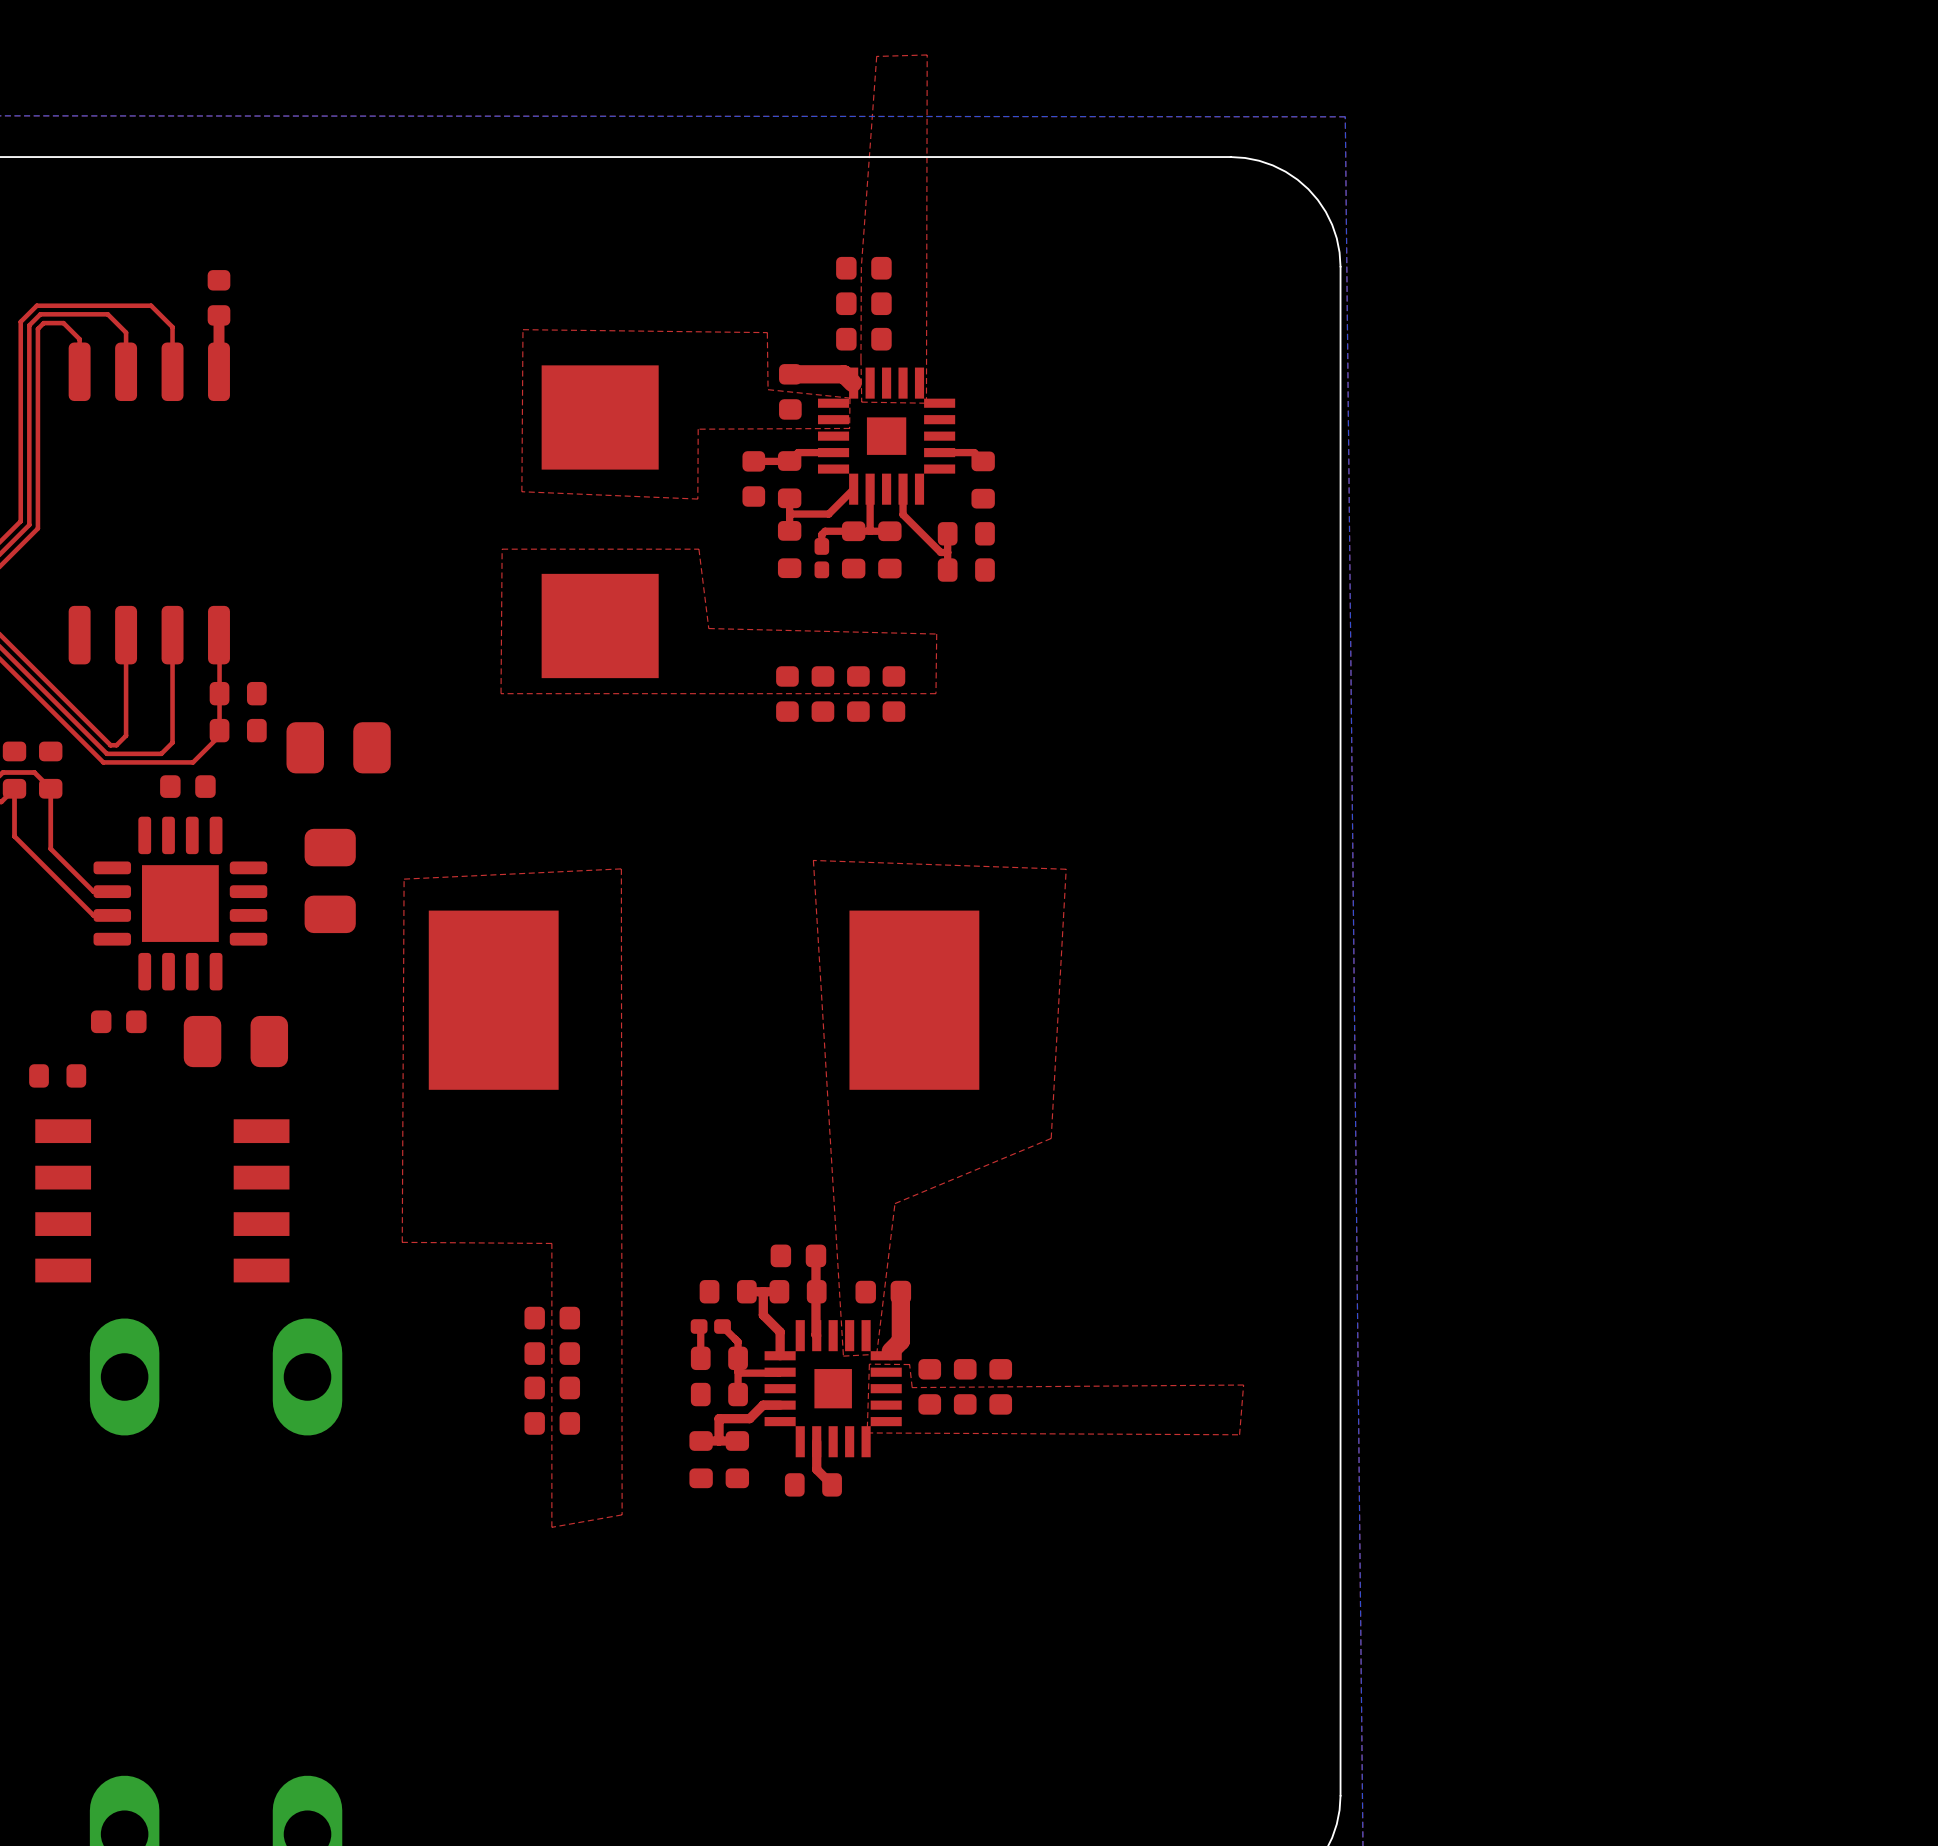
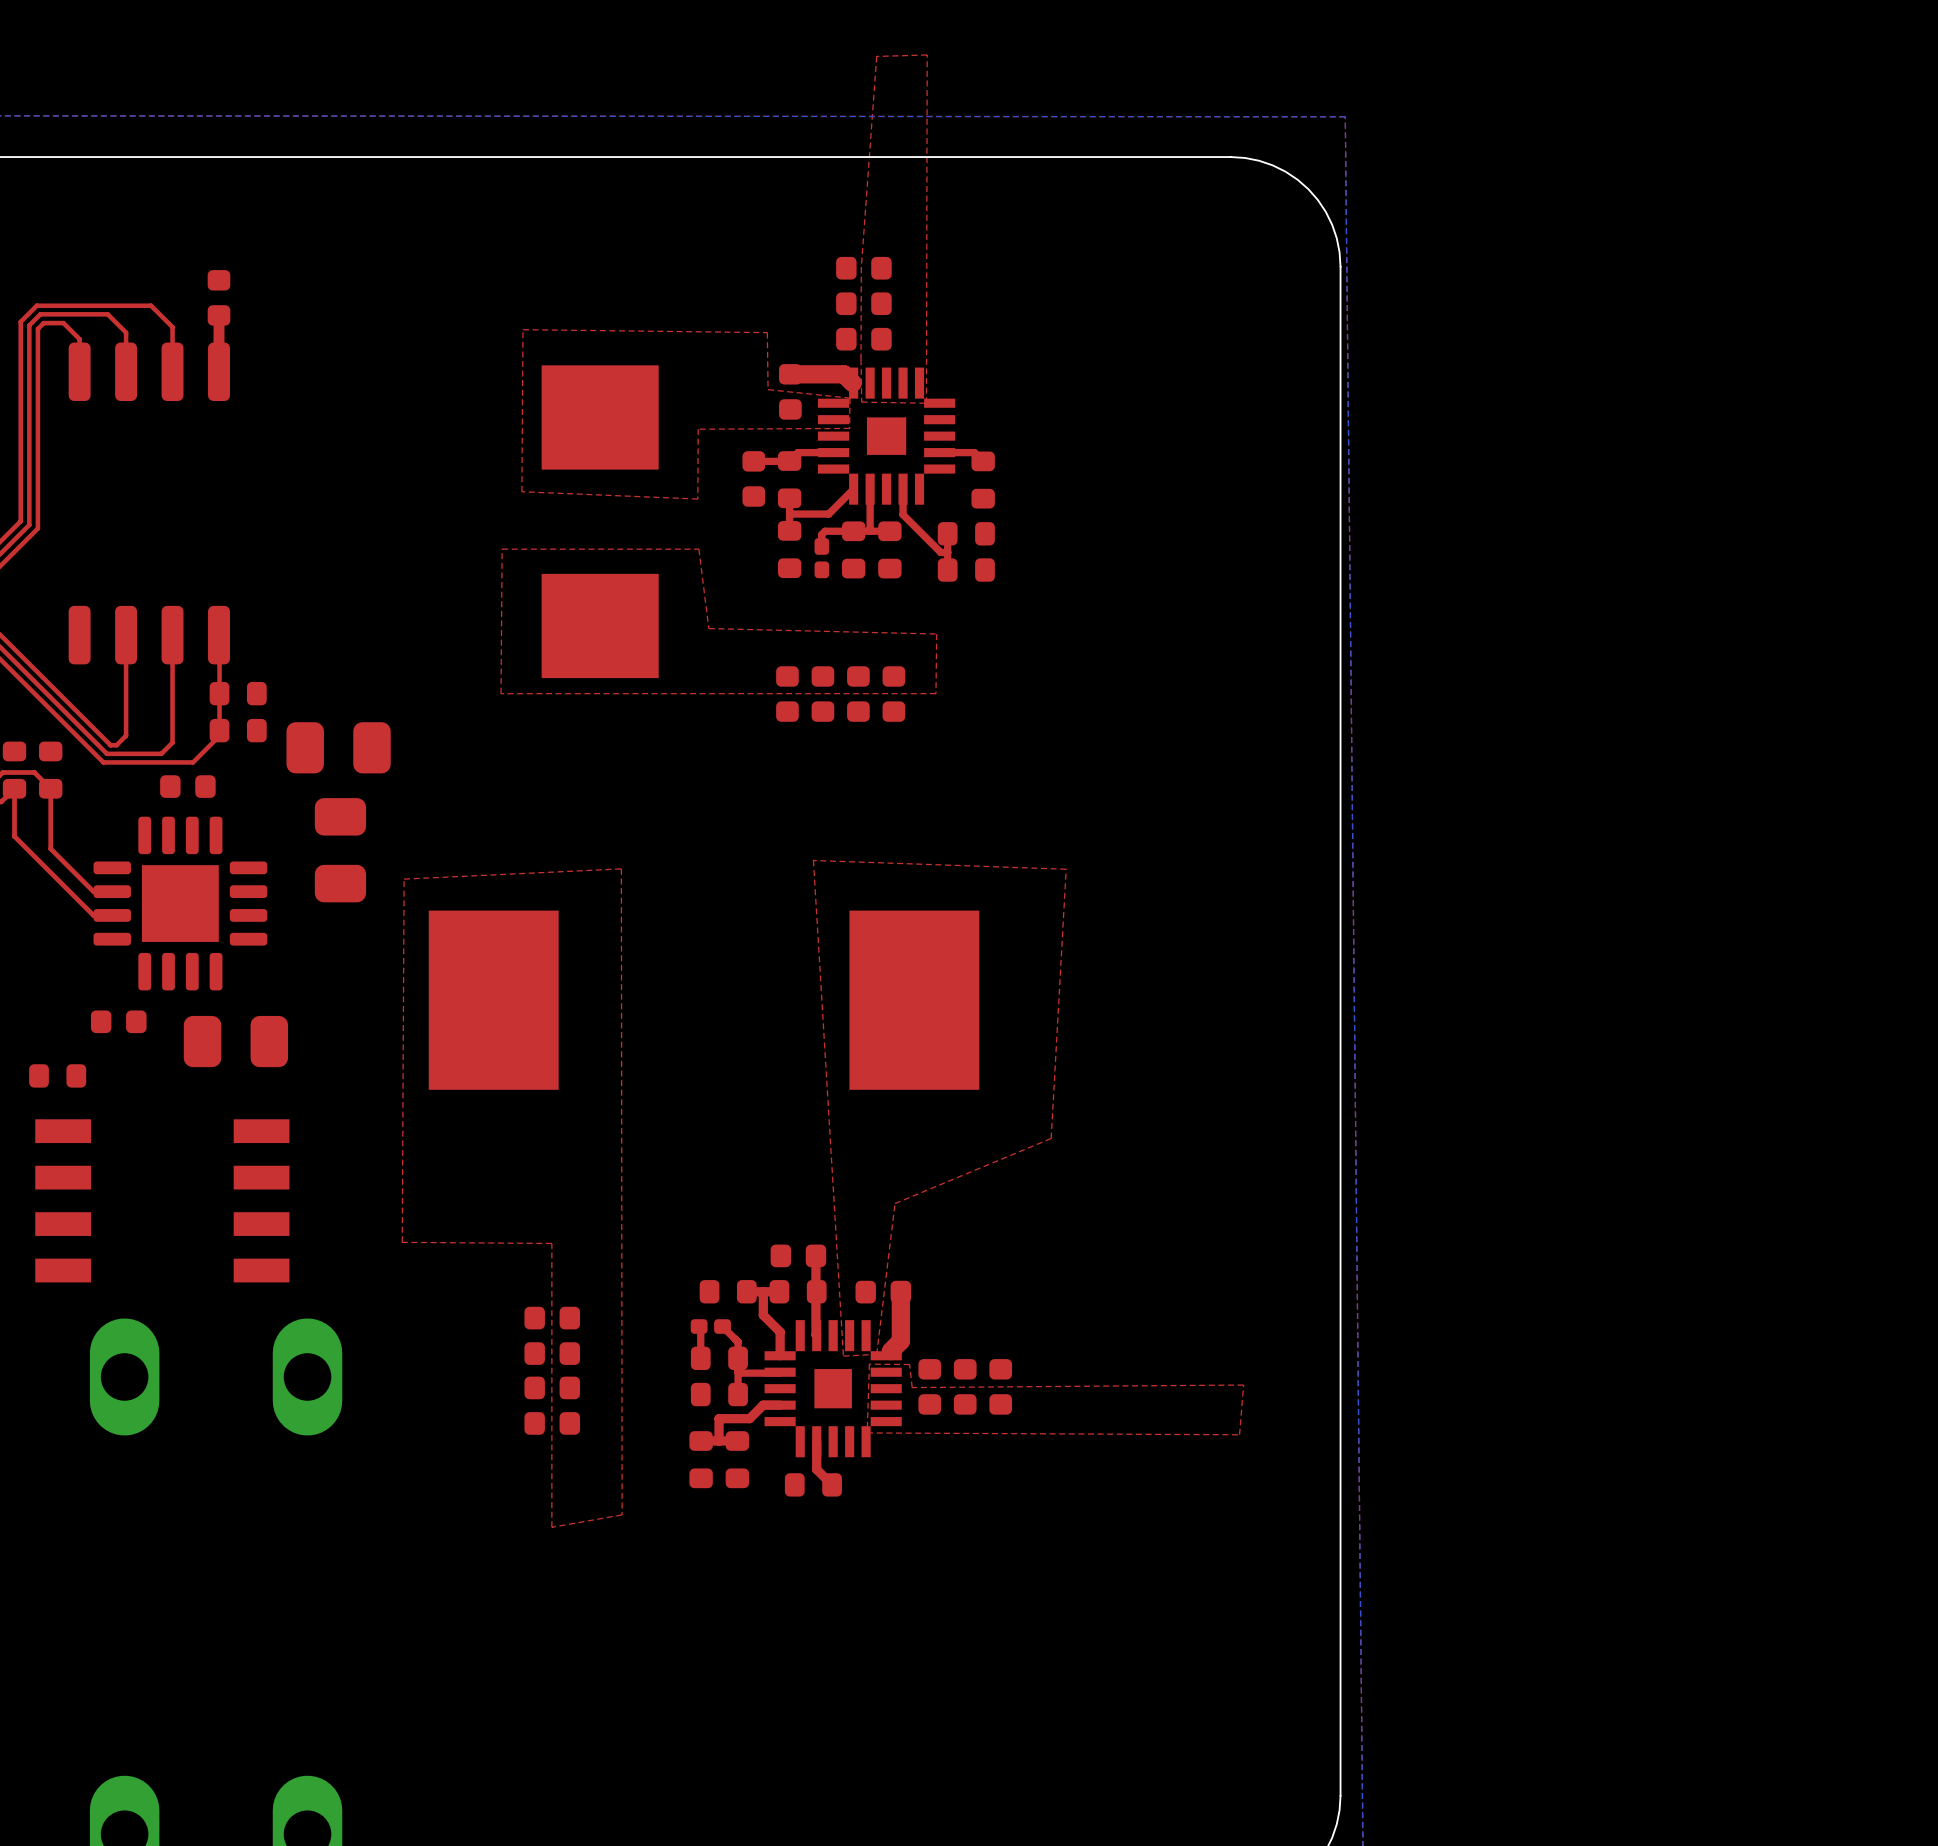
part position: (330, 880) -> (340, 850)

